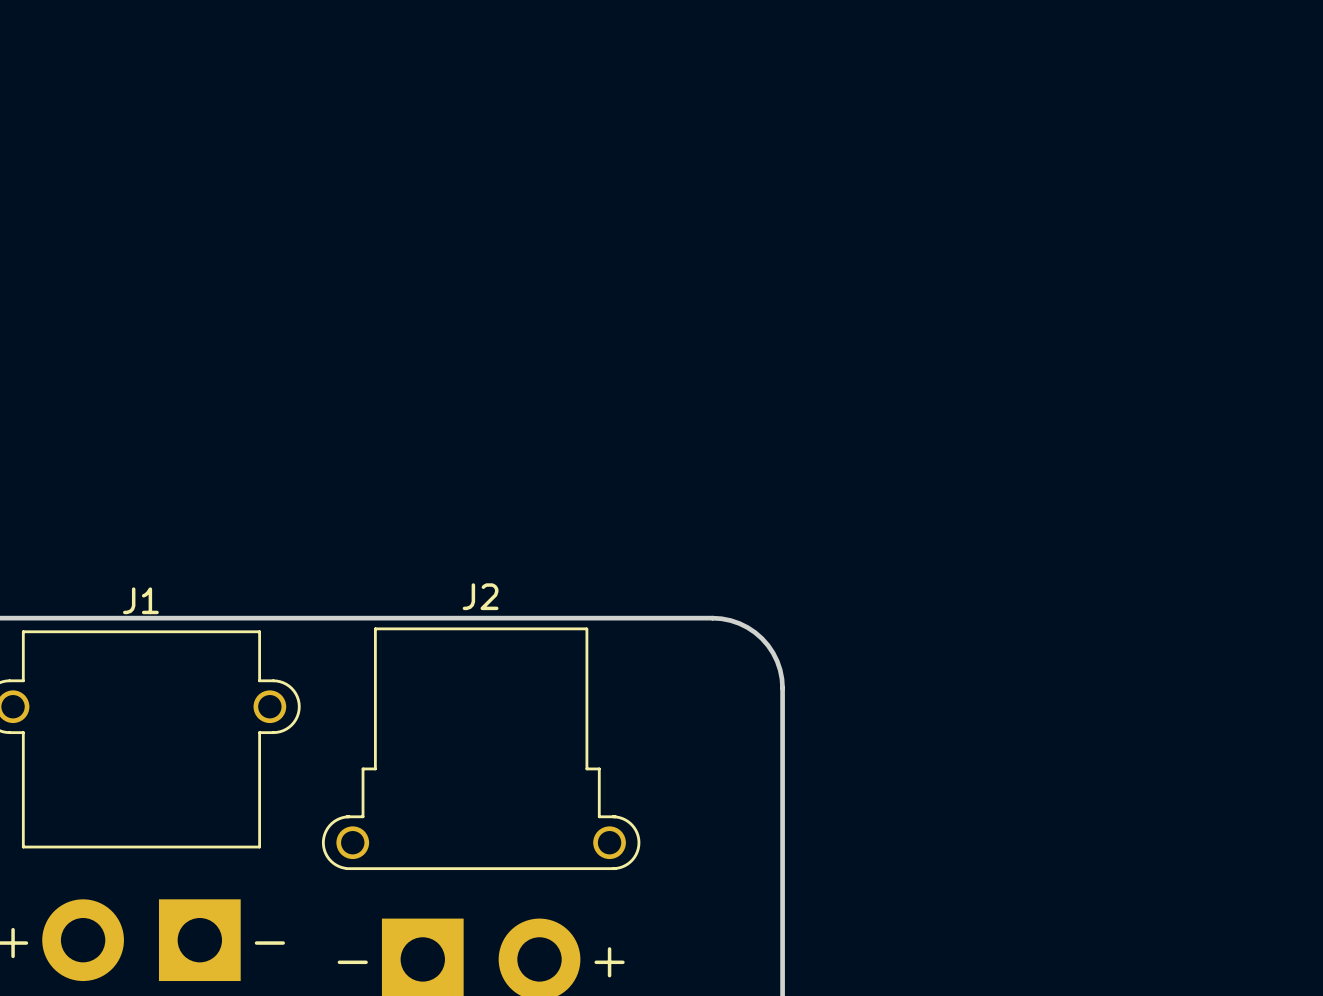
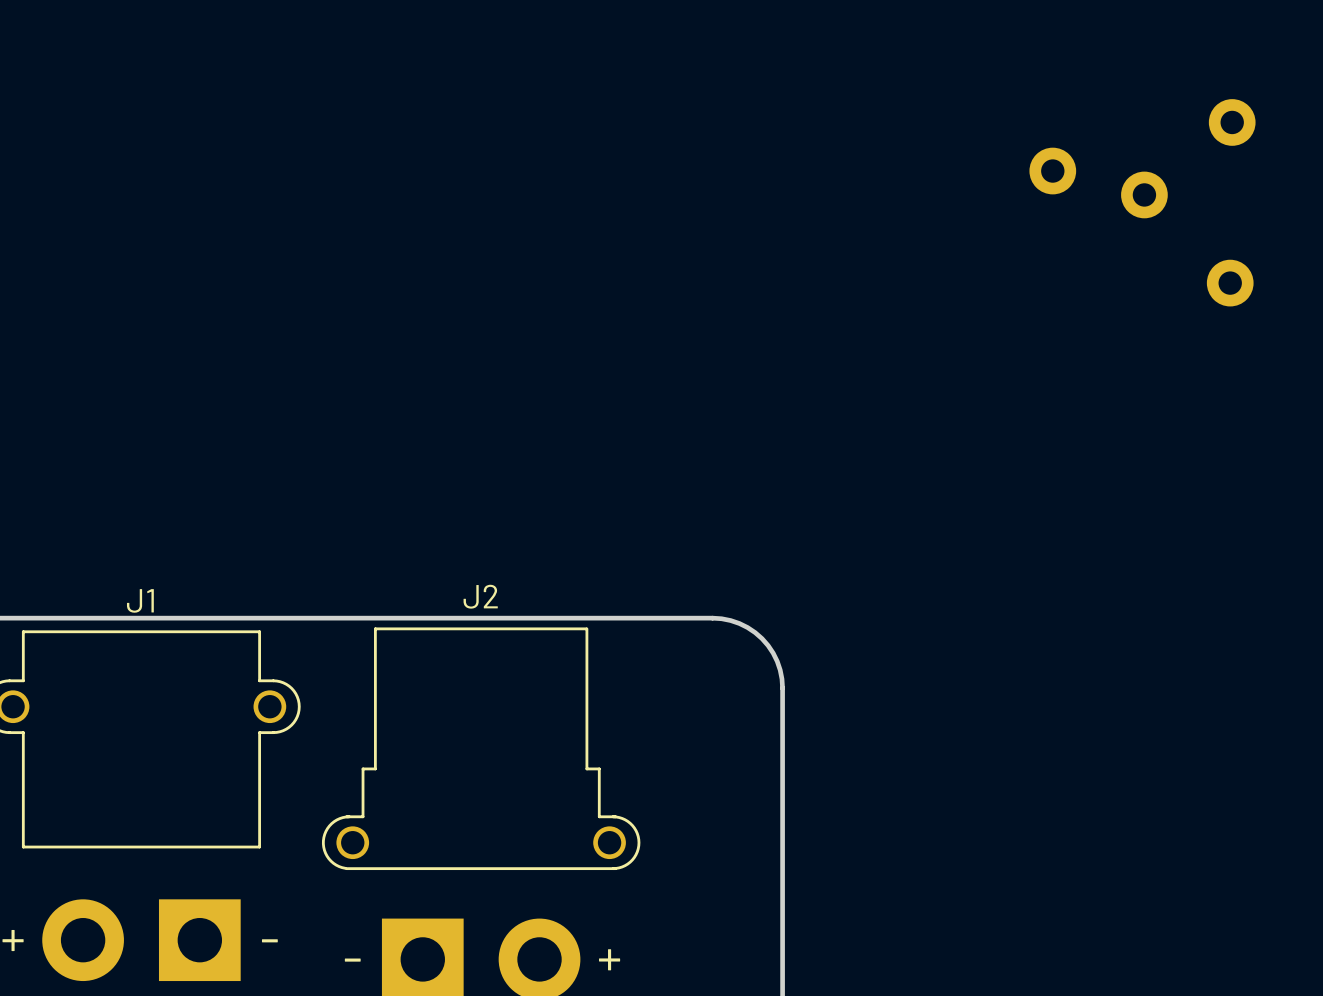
part: none -> (1232, 122)
part: none -> (1052, 171)
part: none -> (1144, 194)
part: none -> (1230, 283)

